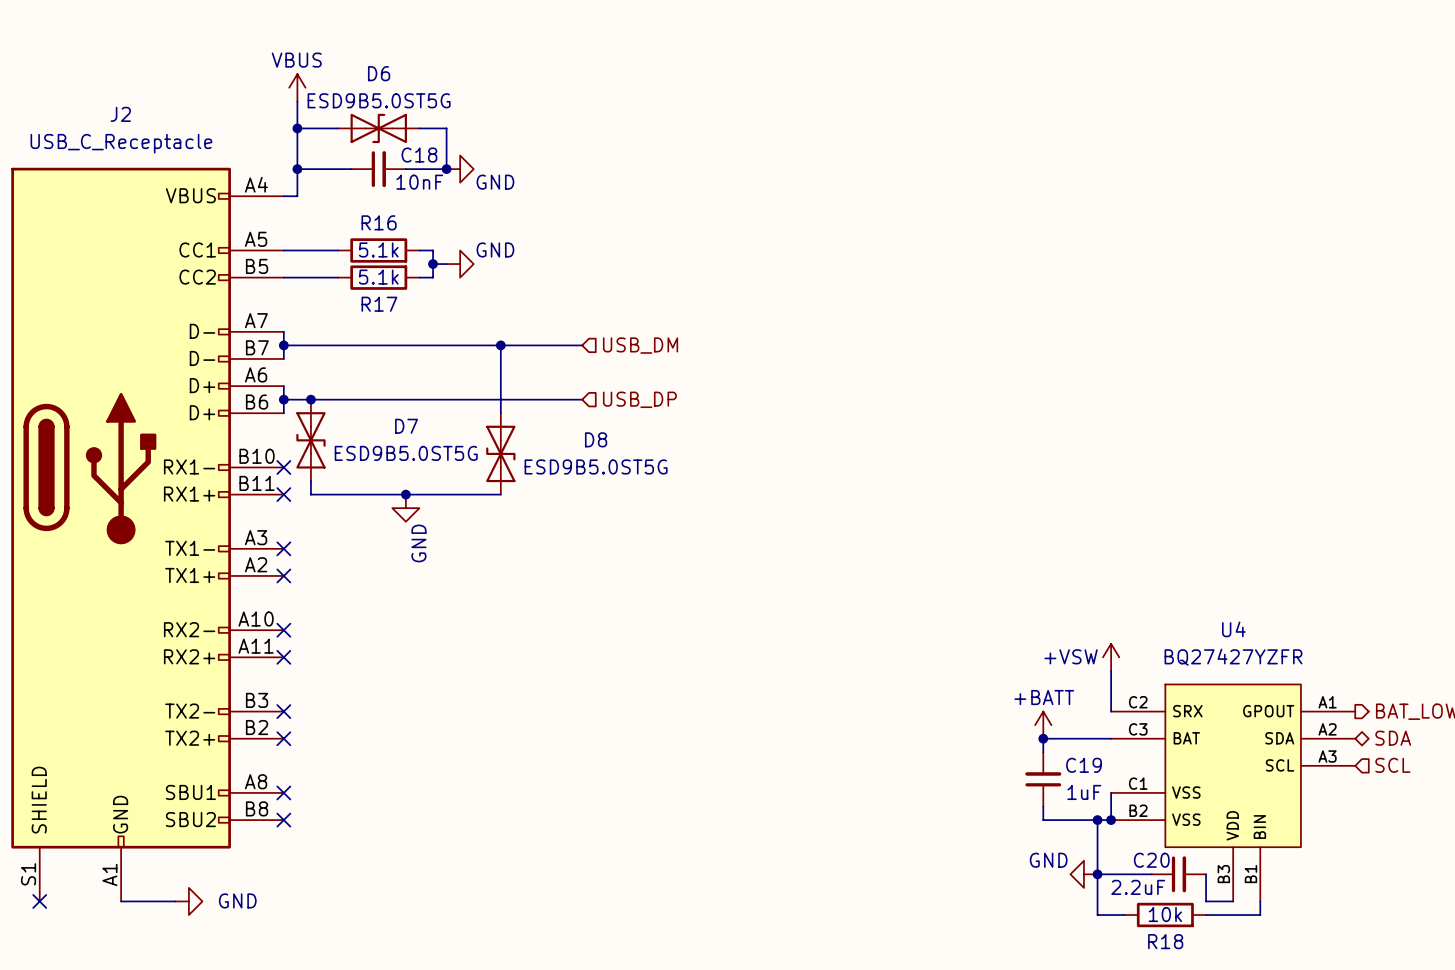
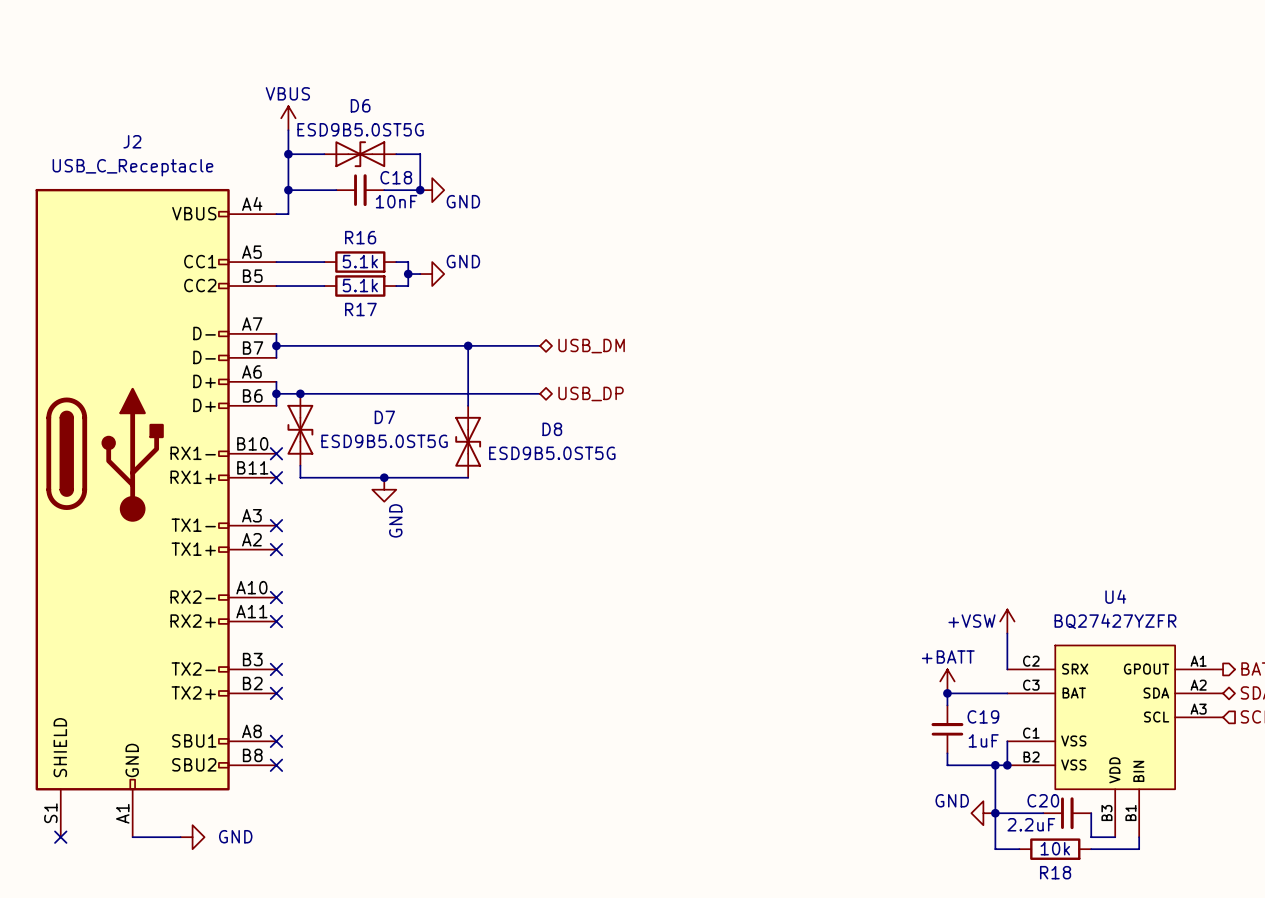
hierarchical label shape: input (640, 345) -> bidirectional (591, 346)
hierarchical label shape: input (639, 399) -> bidirectional (591, 393)

